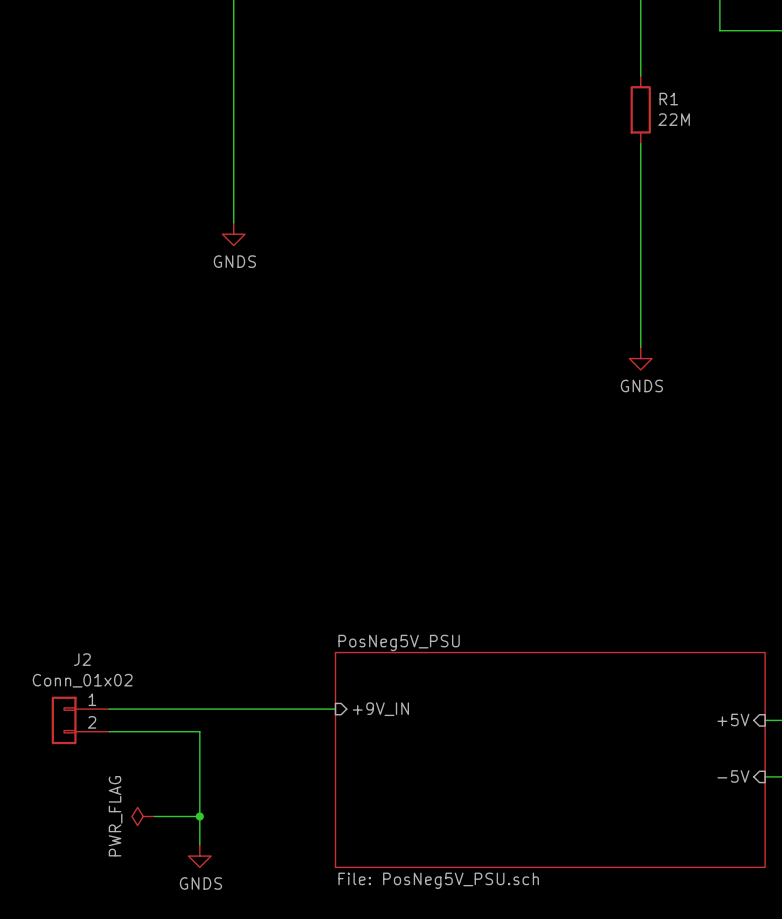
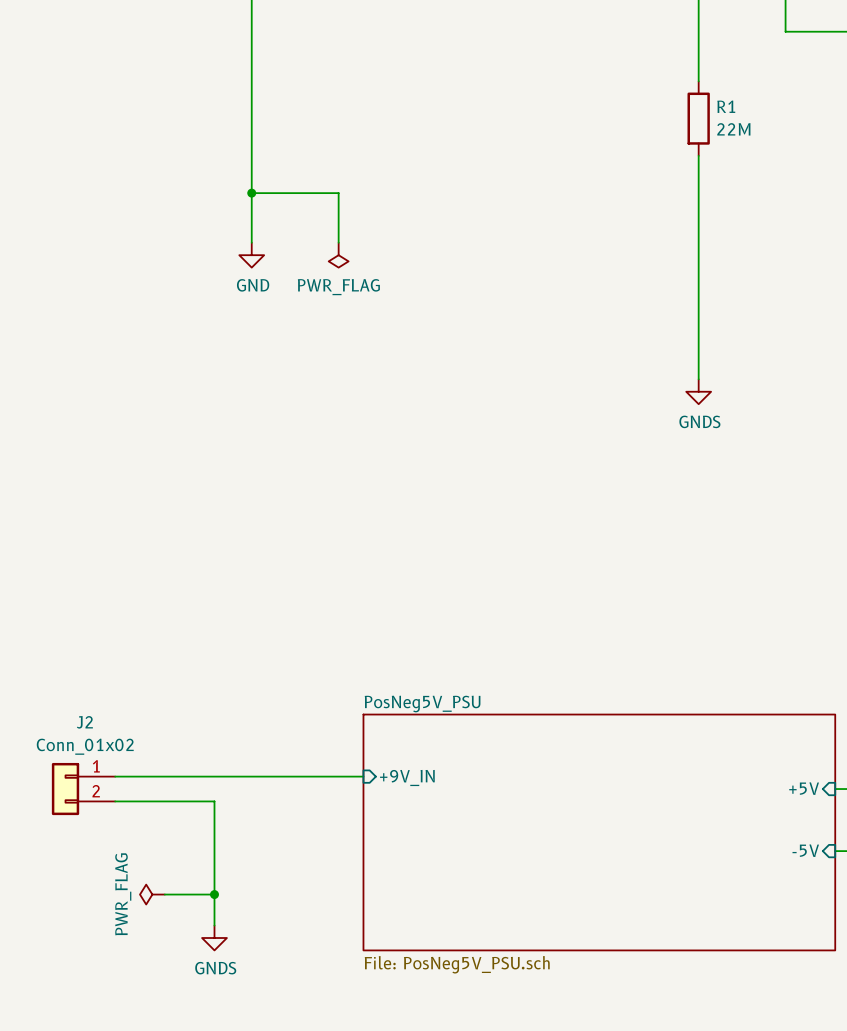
wire: none -> (251, 193) (338, 193) (338, 242)
junction: none -> (251, 193)
power symbol: GNDS (233, 234) -> GND (251, 255)
power symbol: none -> PWR_FLAG (338, 255)

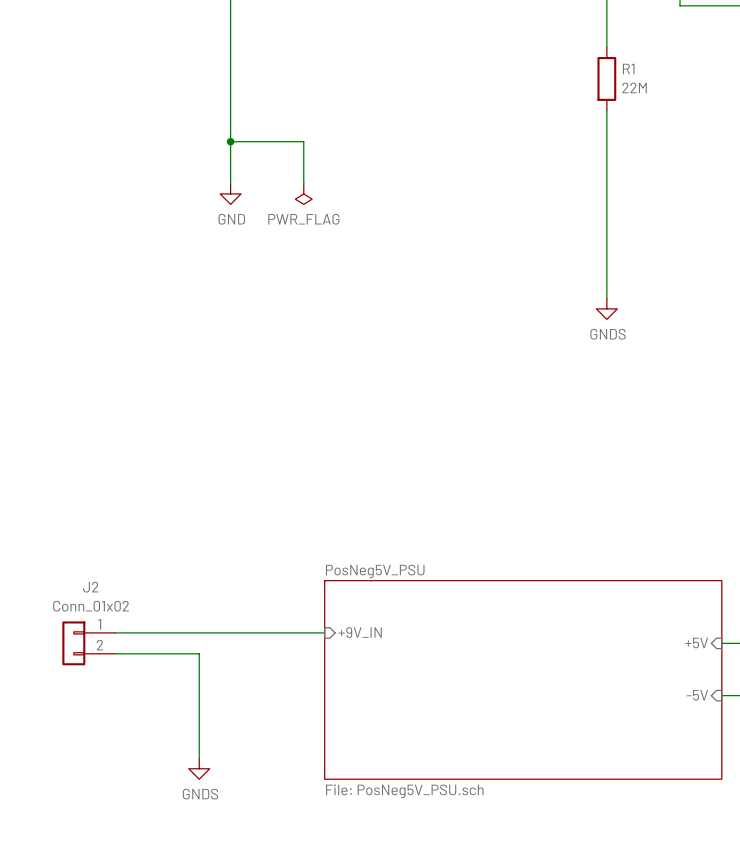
power symbol: PWR_FLAG (152, 894) -> none
wire: (164, 894) (214, 894) -> none
junction: (214, 894) -> none

